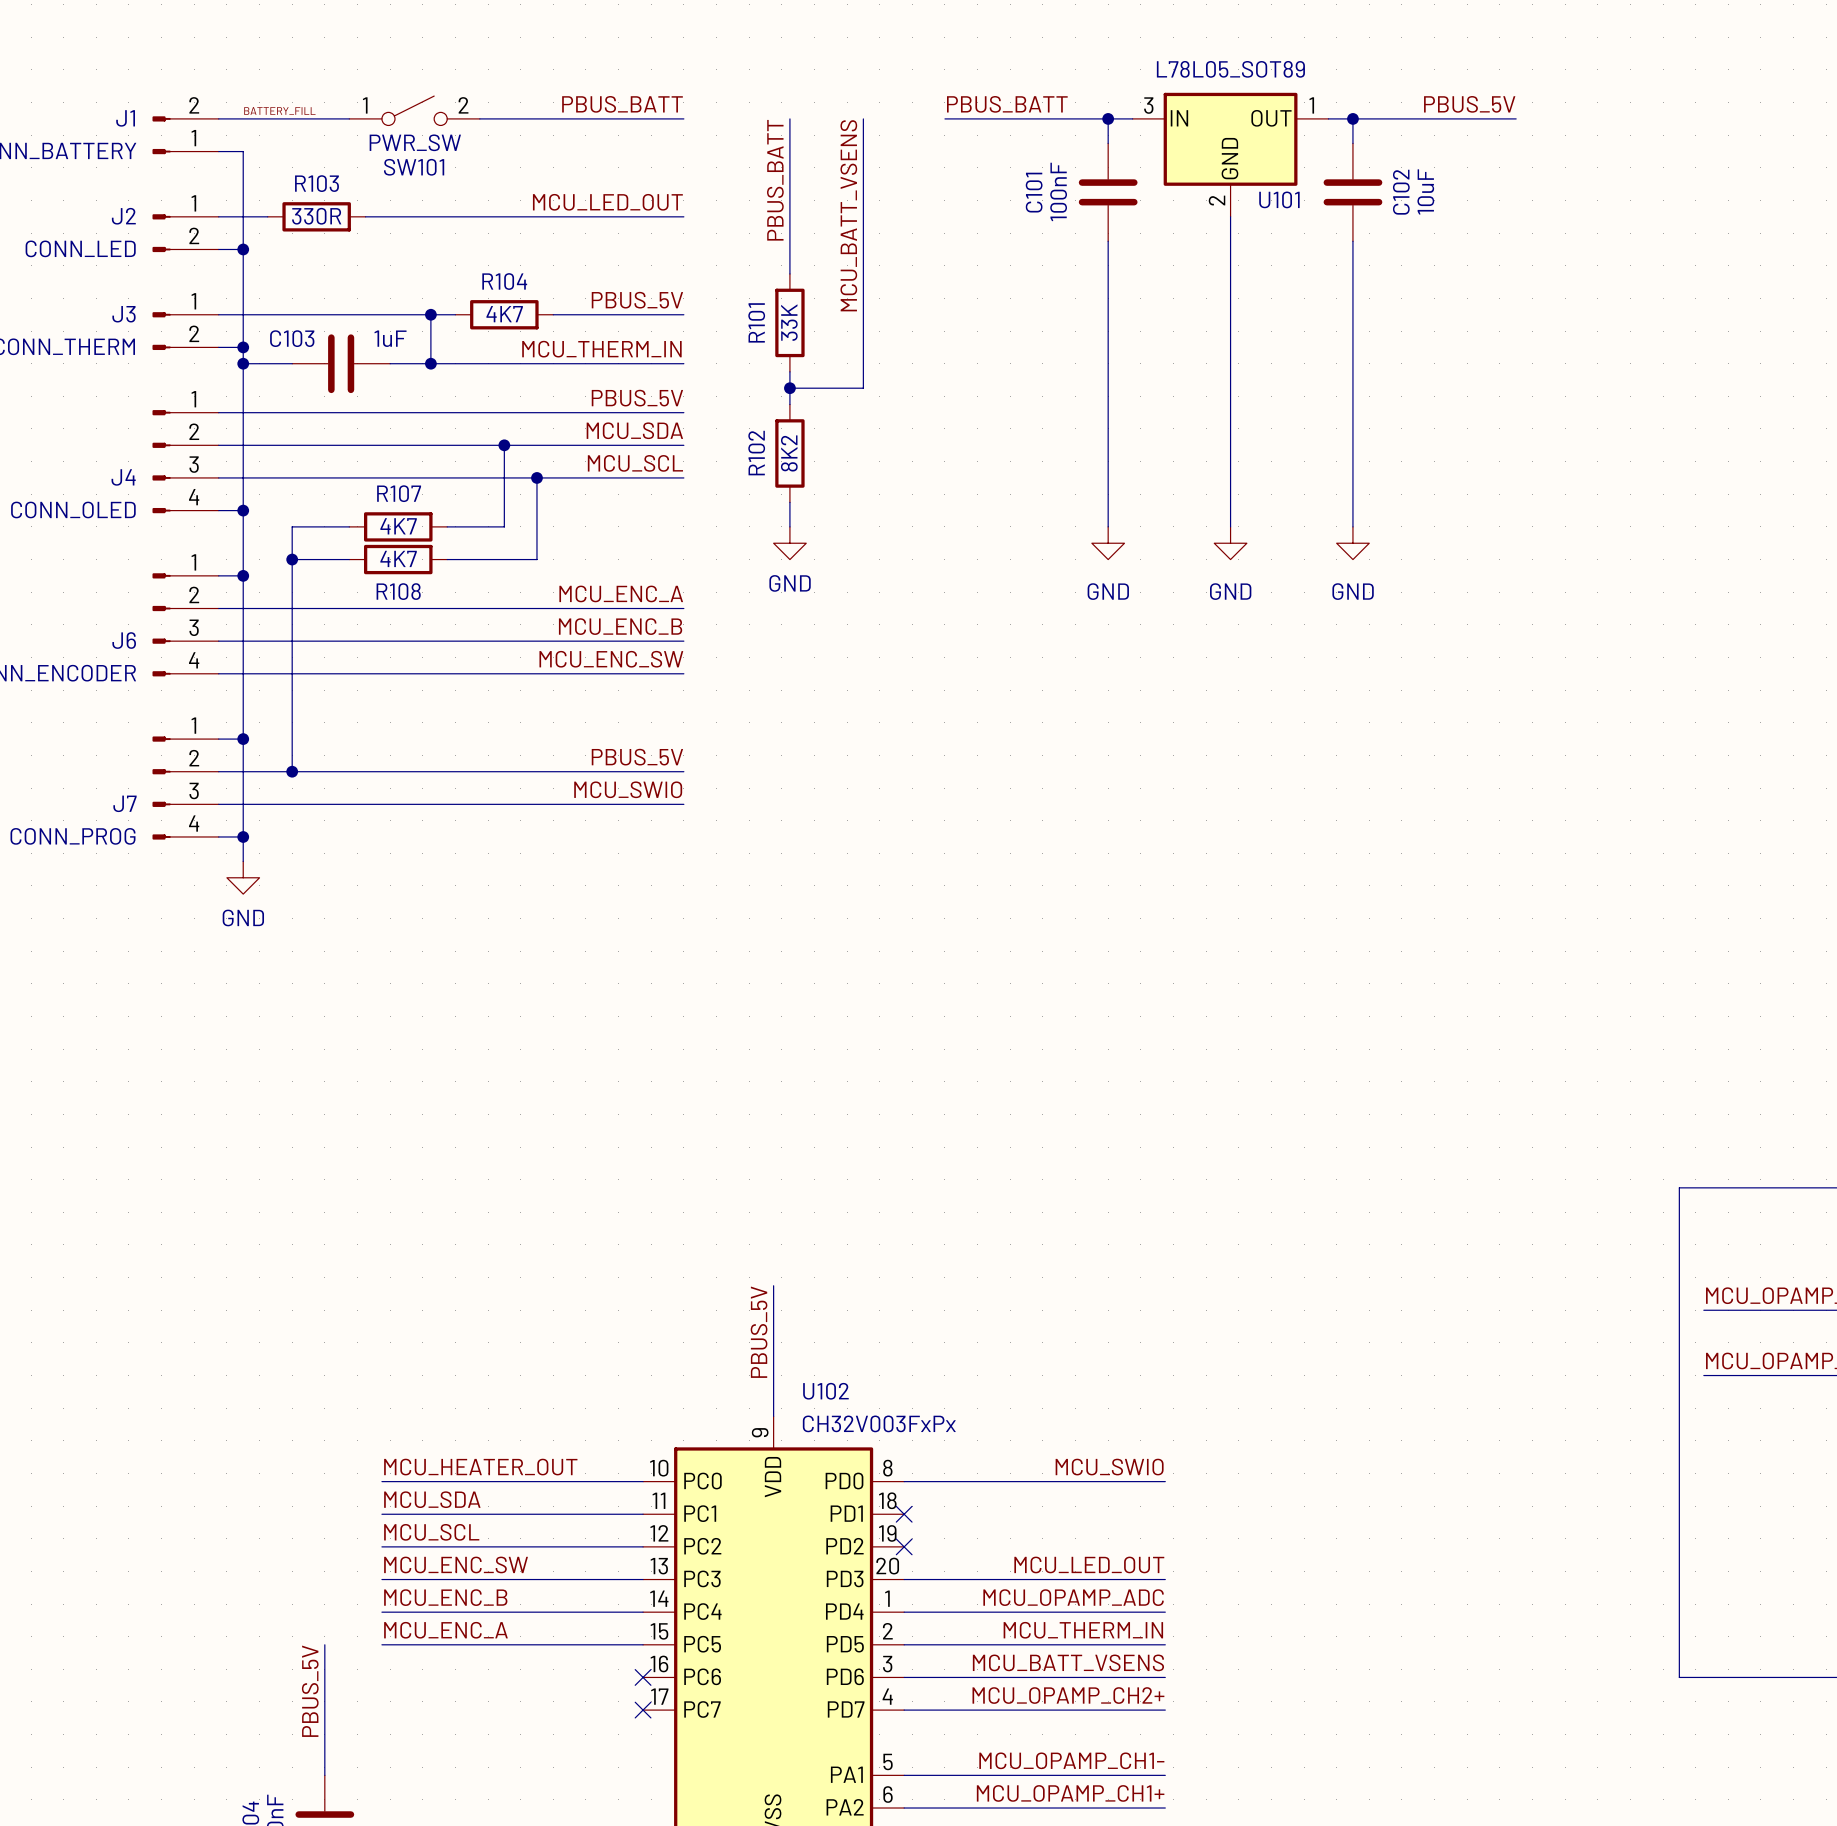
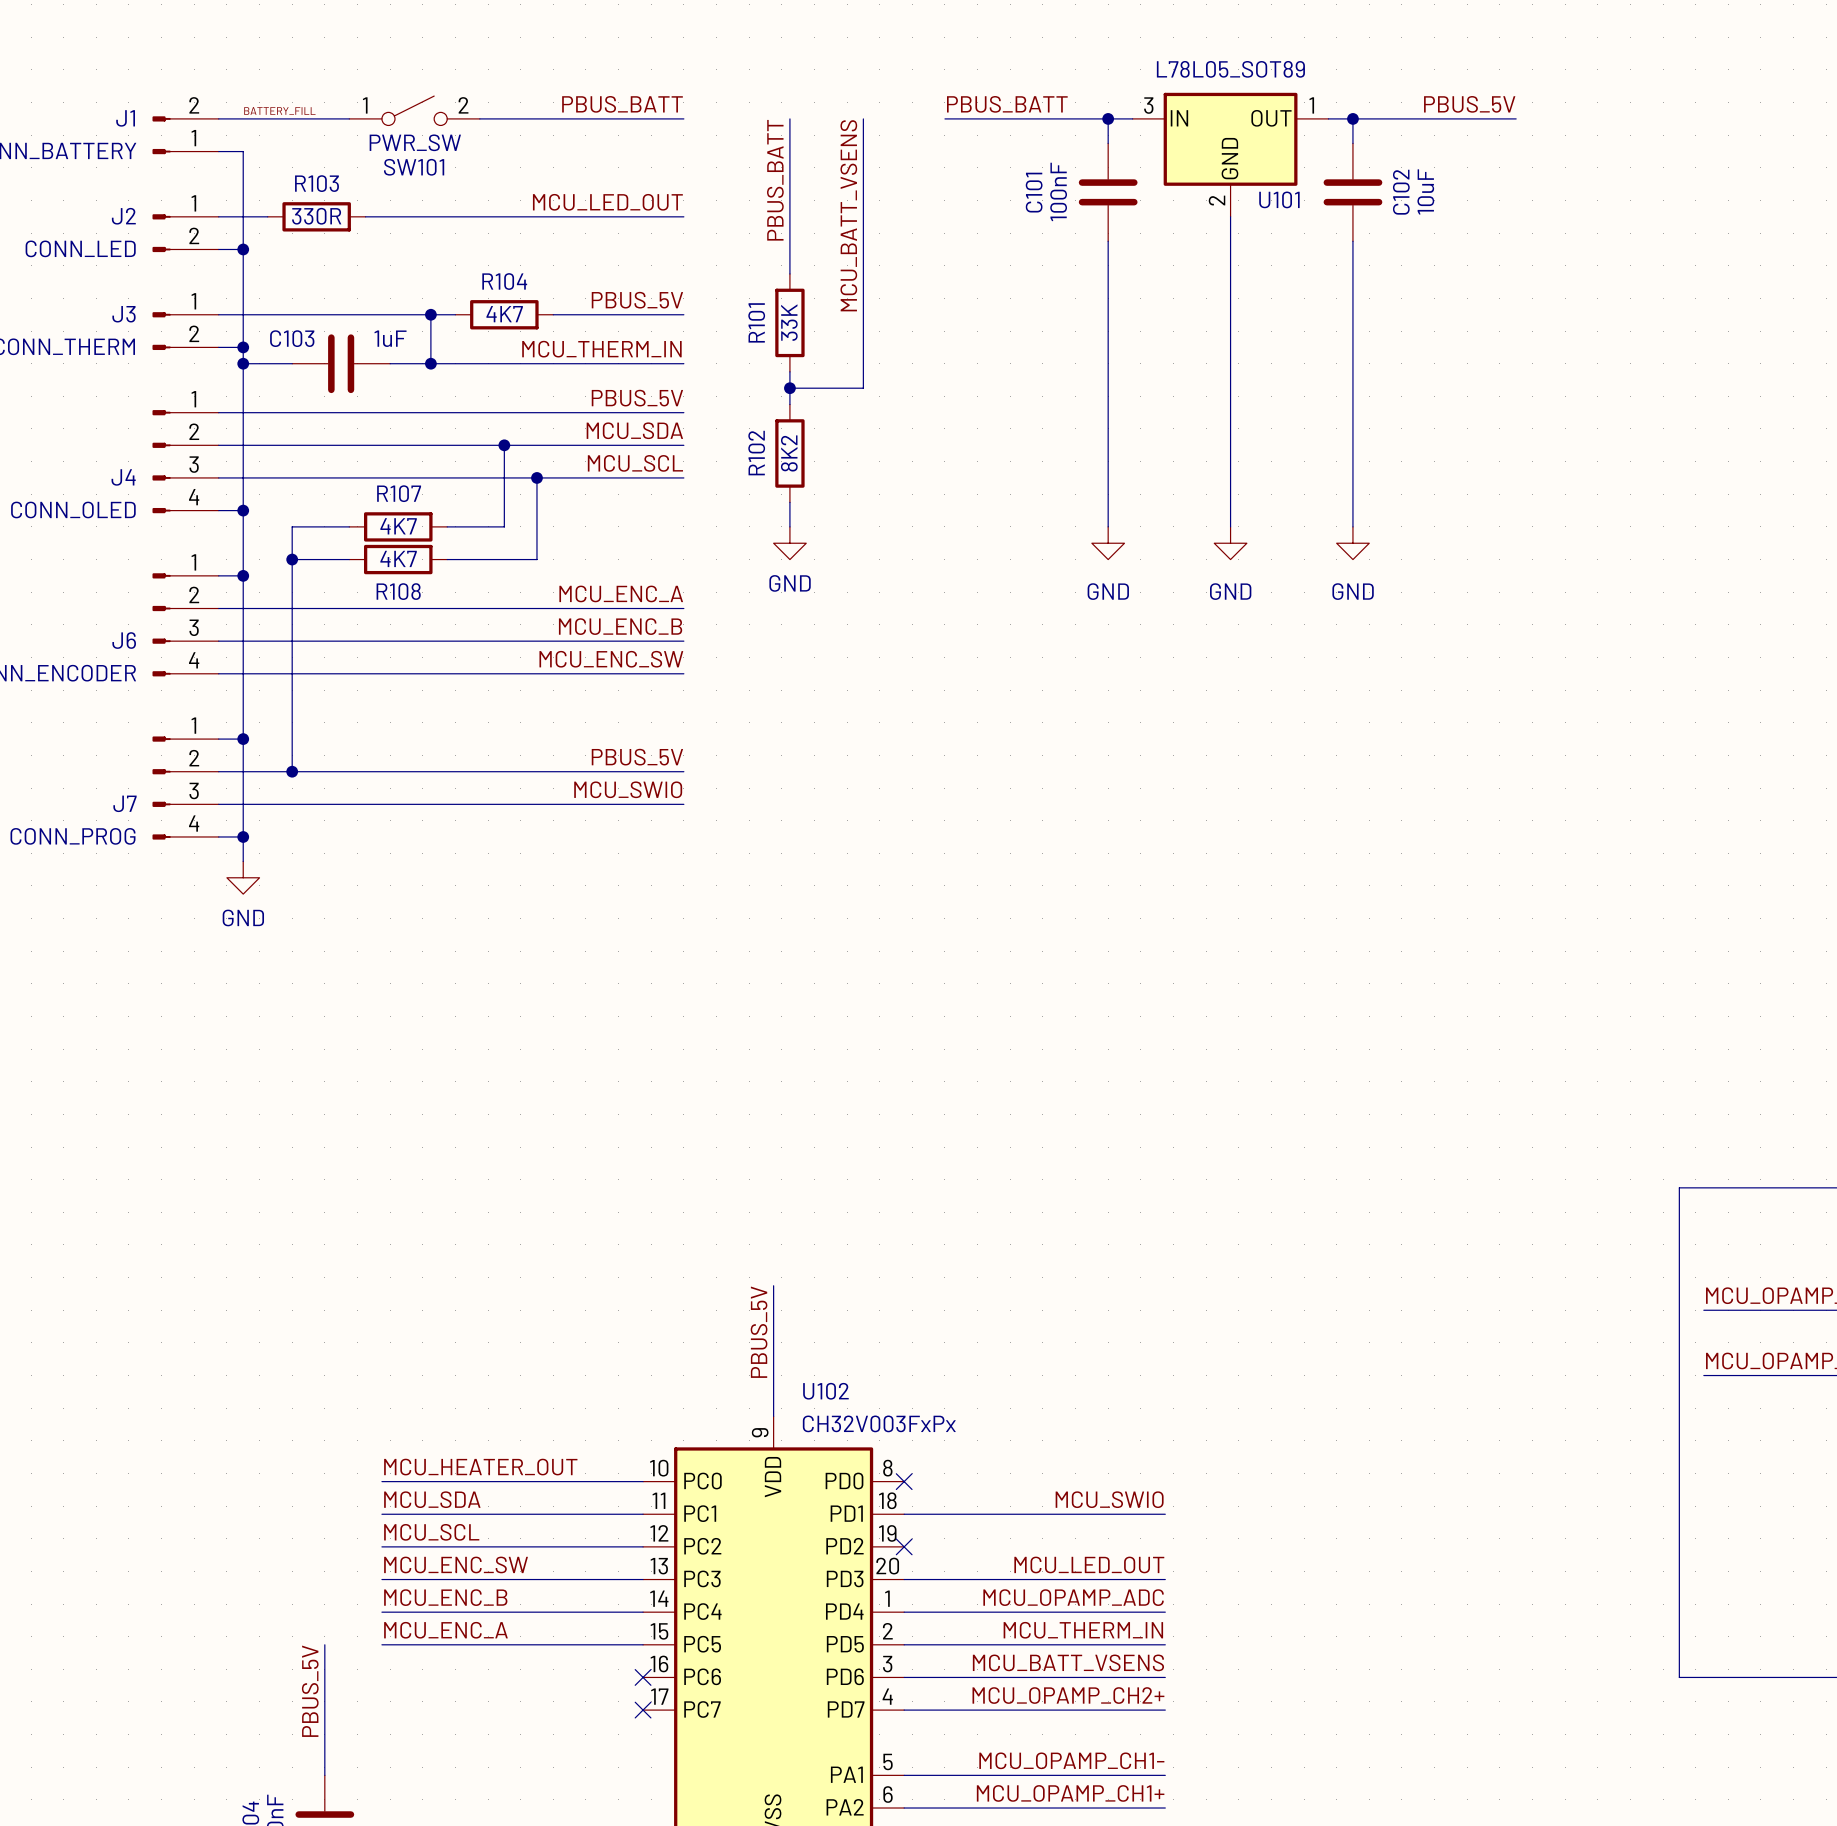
label position: MCU_SWIO (1109, 1467) -> MCU_SWIO (1109, 1499)
wire: (904, 1481) (1165, 1481) -> (904, 1514) (1165, 1514)
no-connect mark position: (904, 1514) -> (904, 1481)

